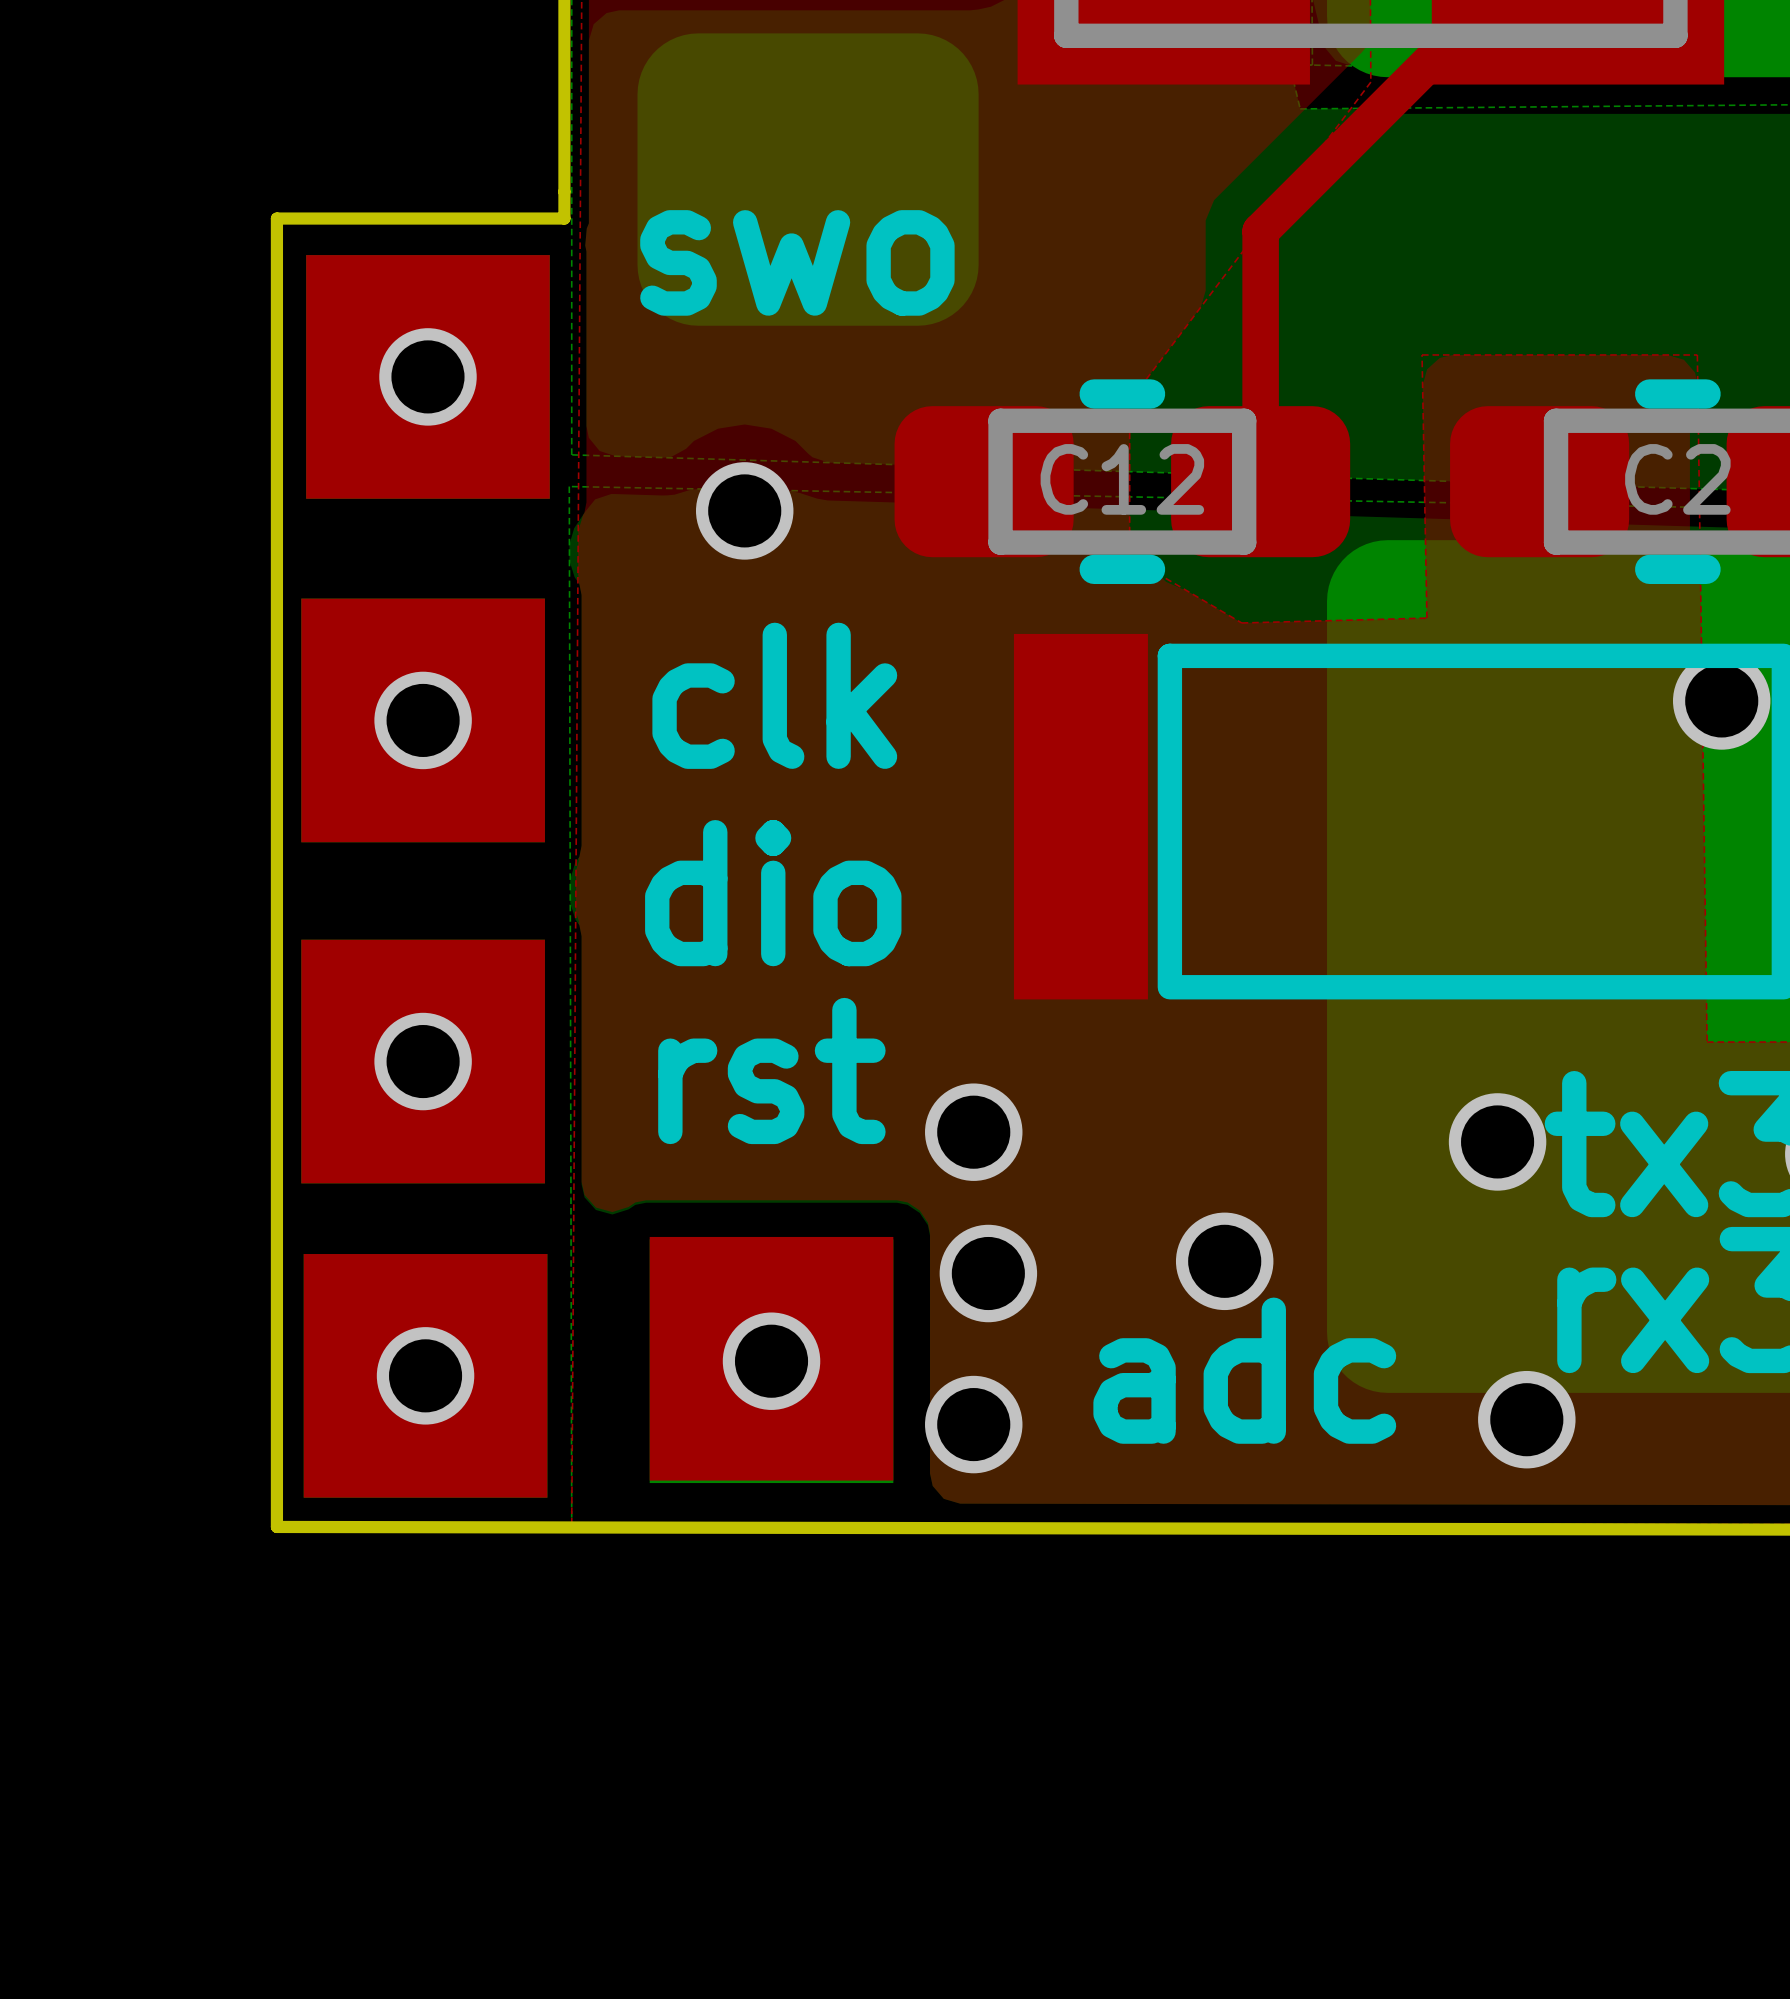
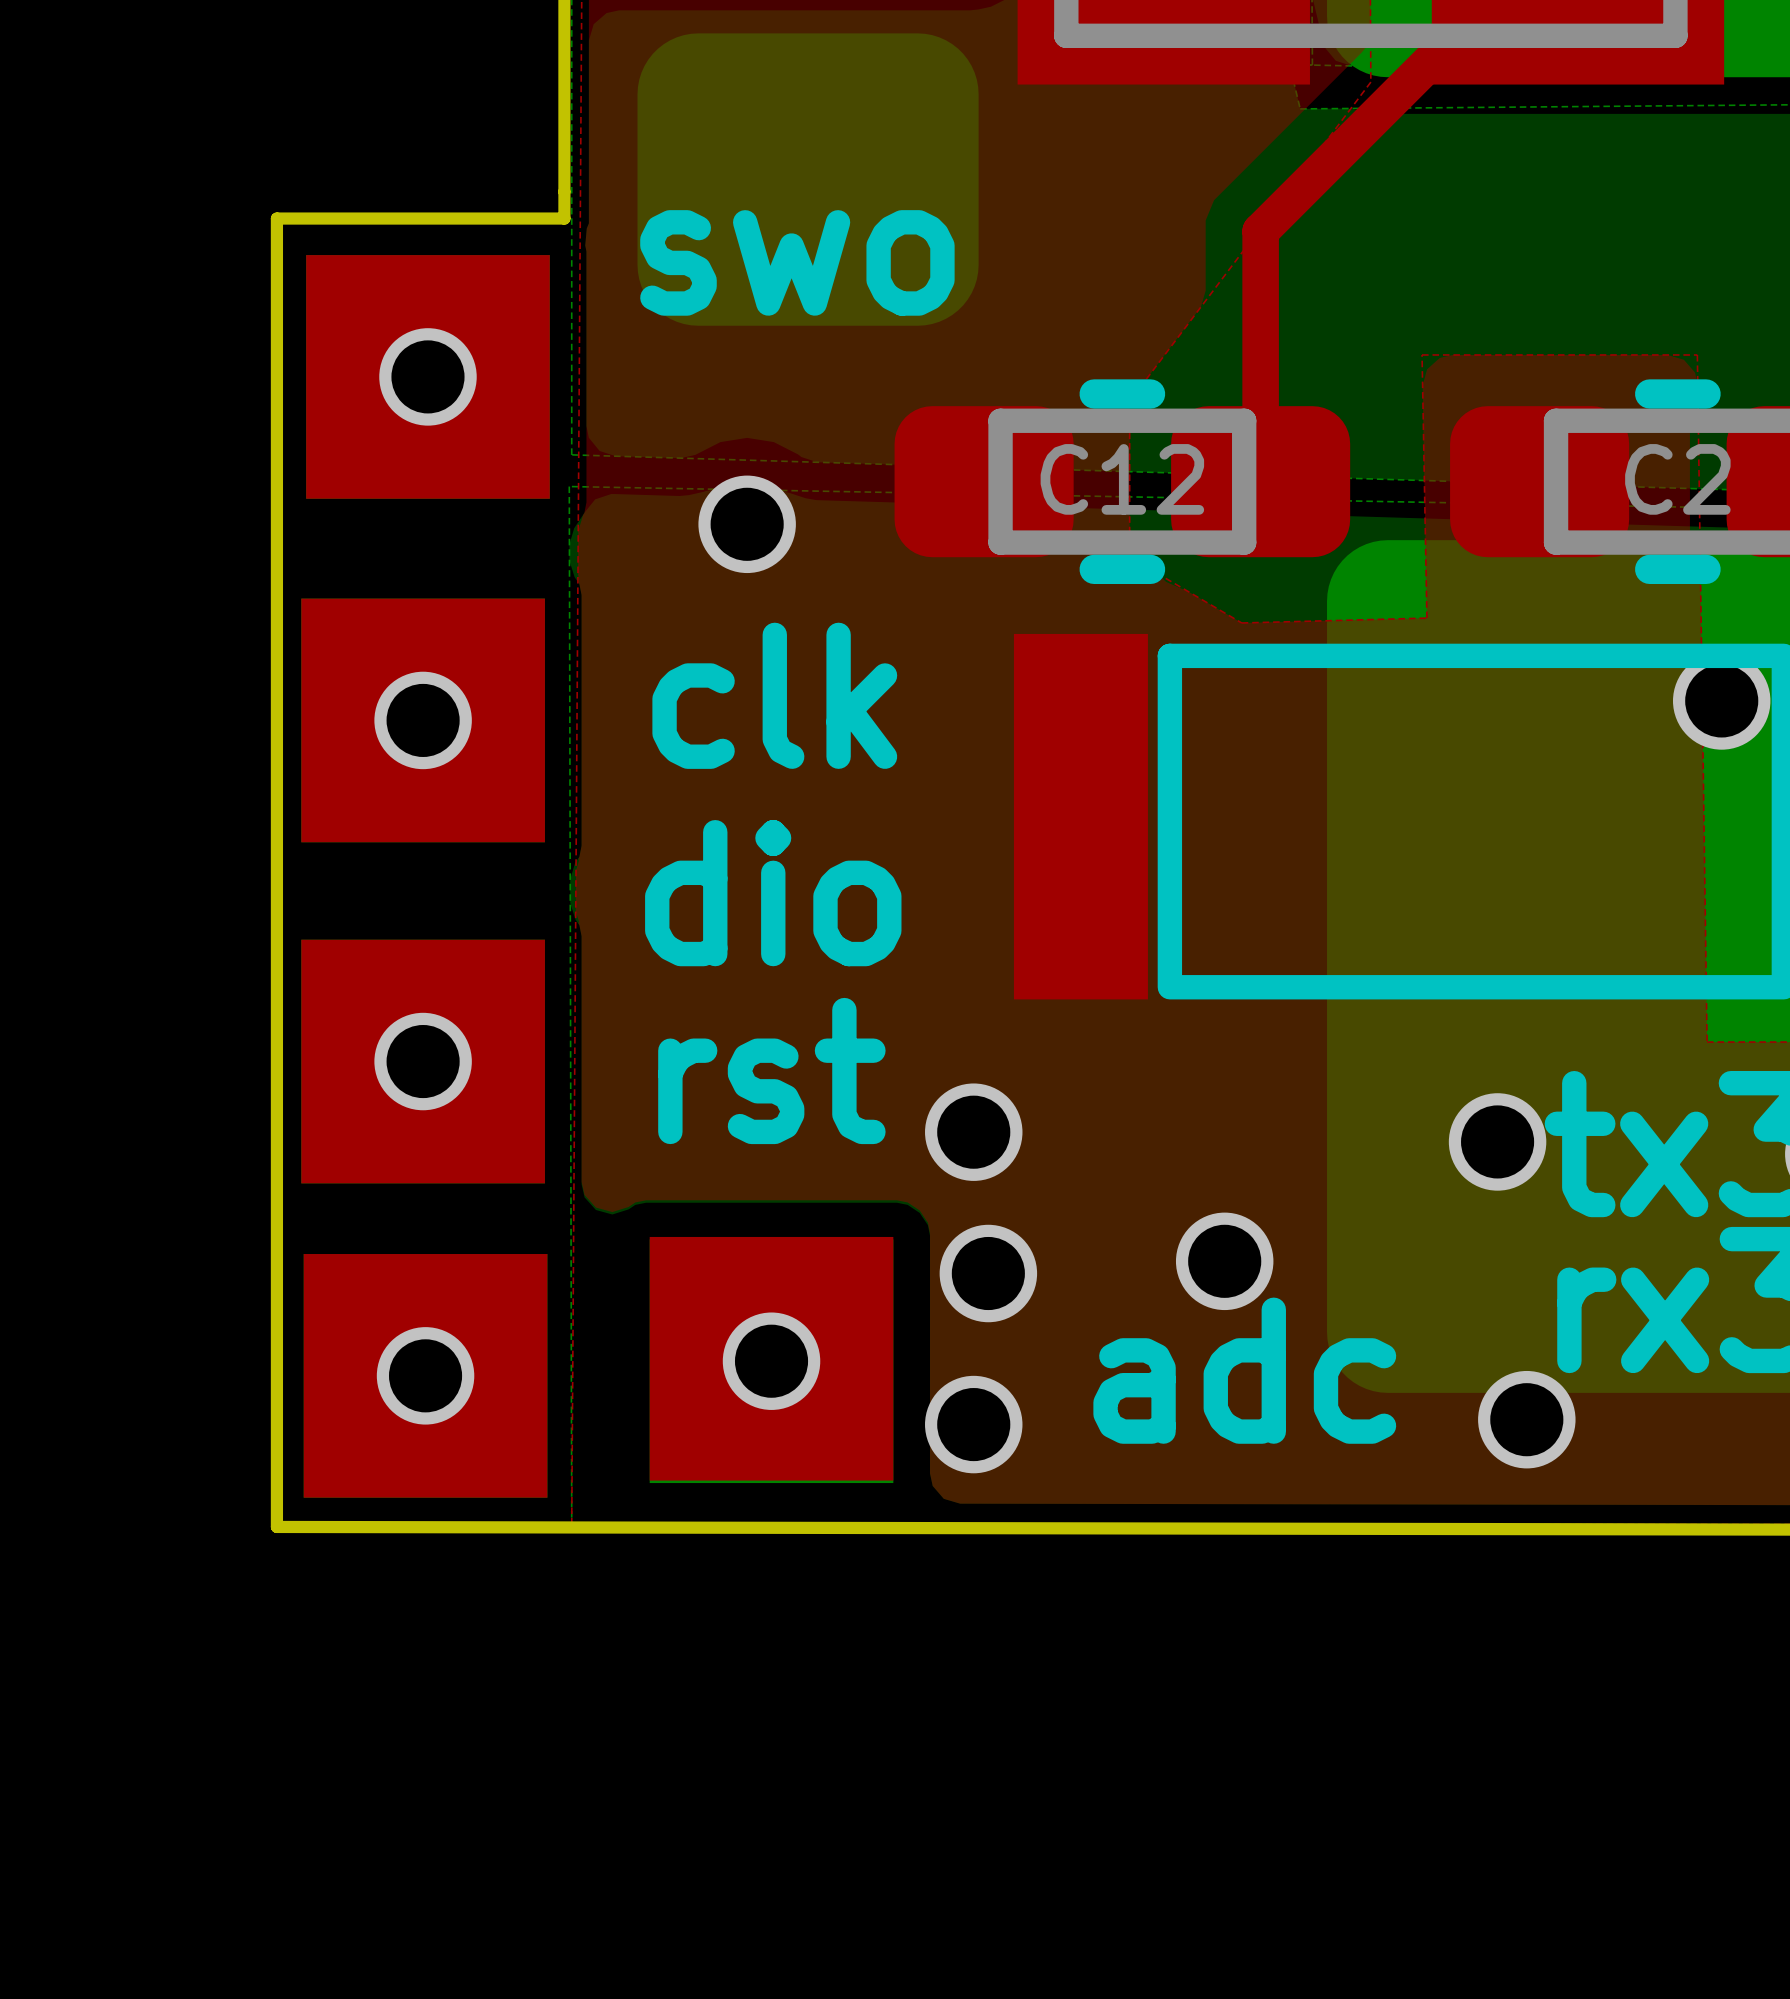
via position: (744, 510) -> (747, 524)

